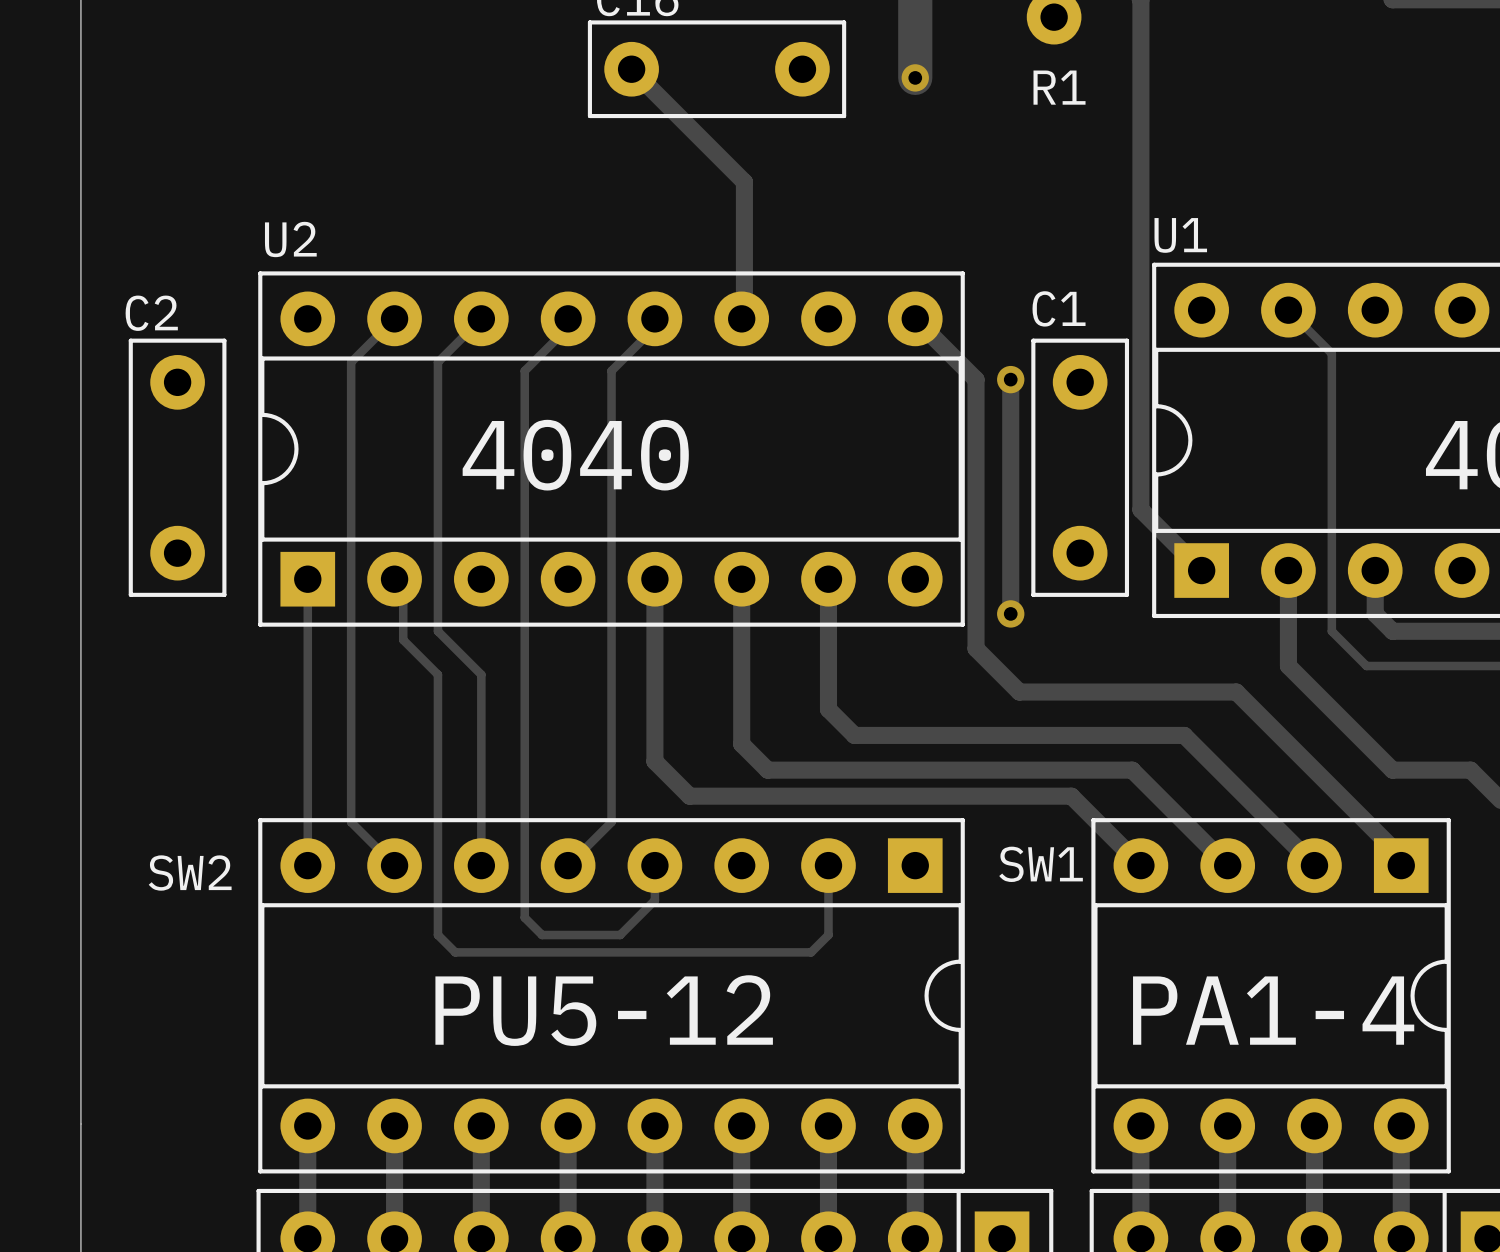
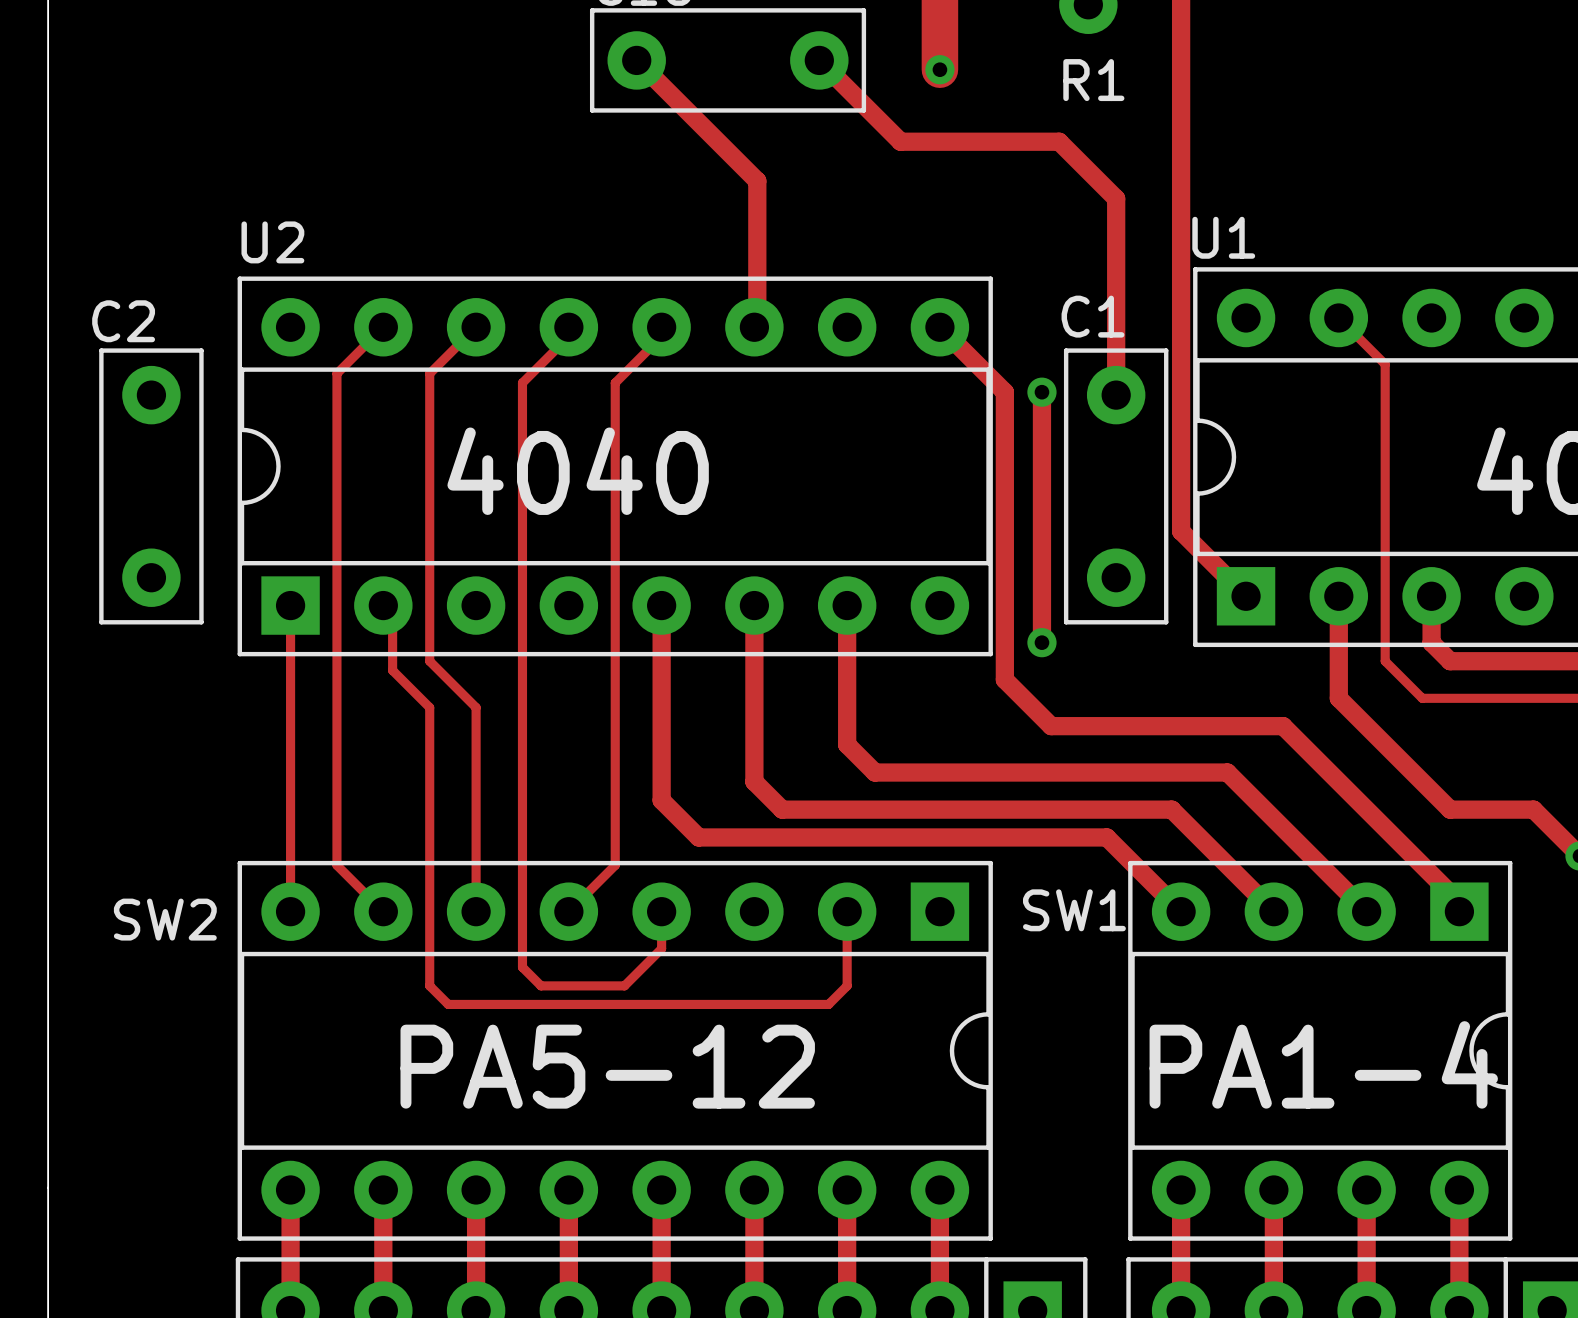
track: none -> (819, 60) (900, 141) (1059, 141) (1116, 198) (1116, 395)
text: PU5-12 (604, 1010) -> PA5-12 (607, 1066)

